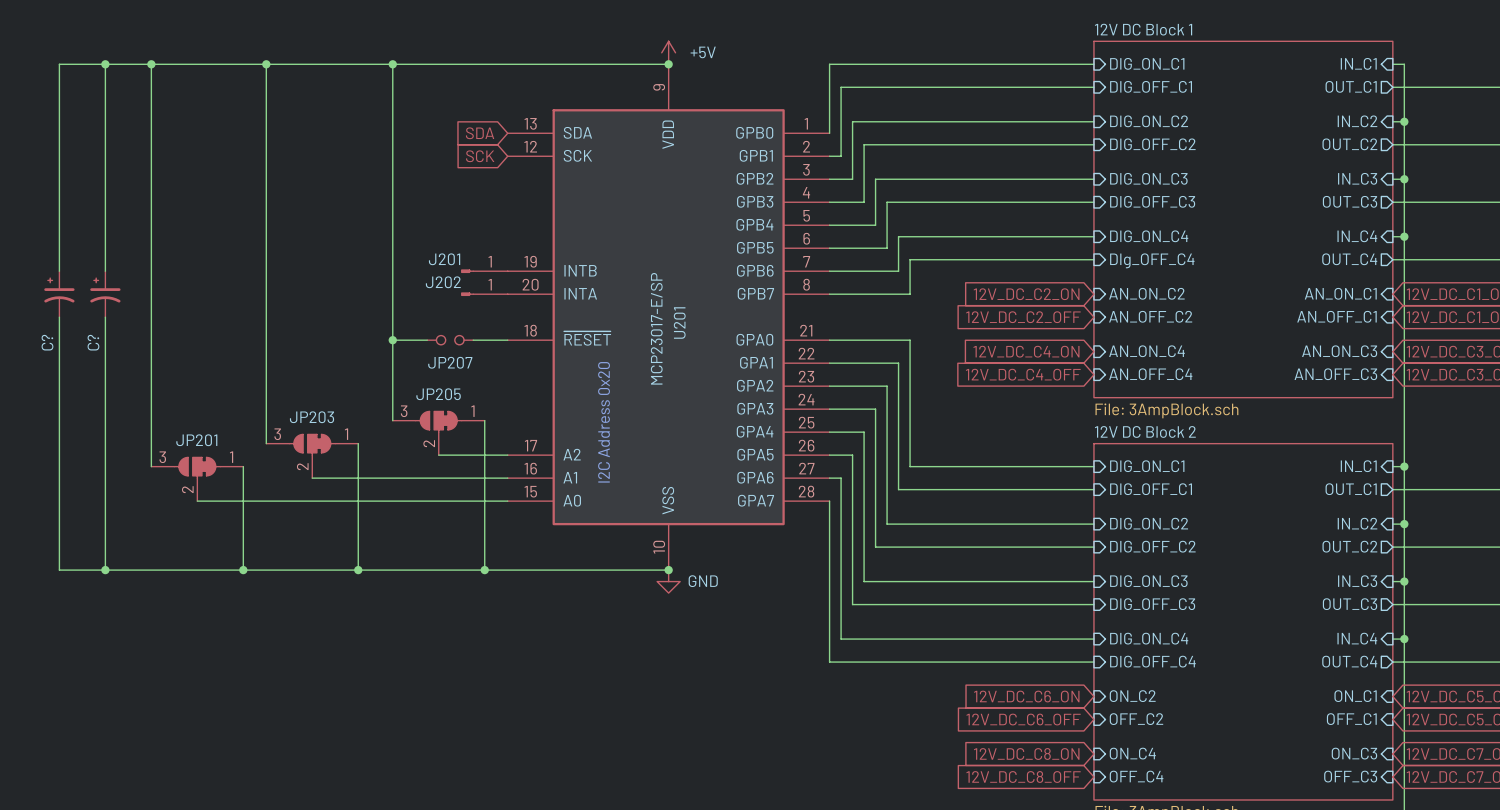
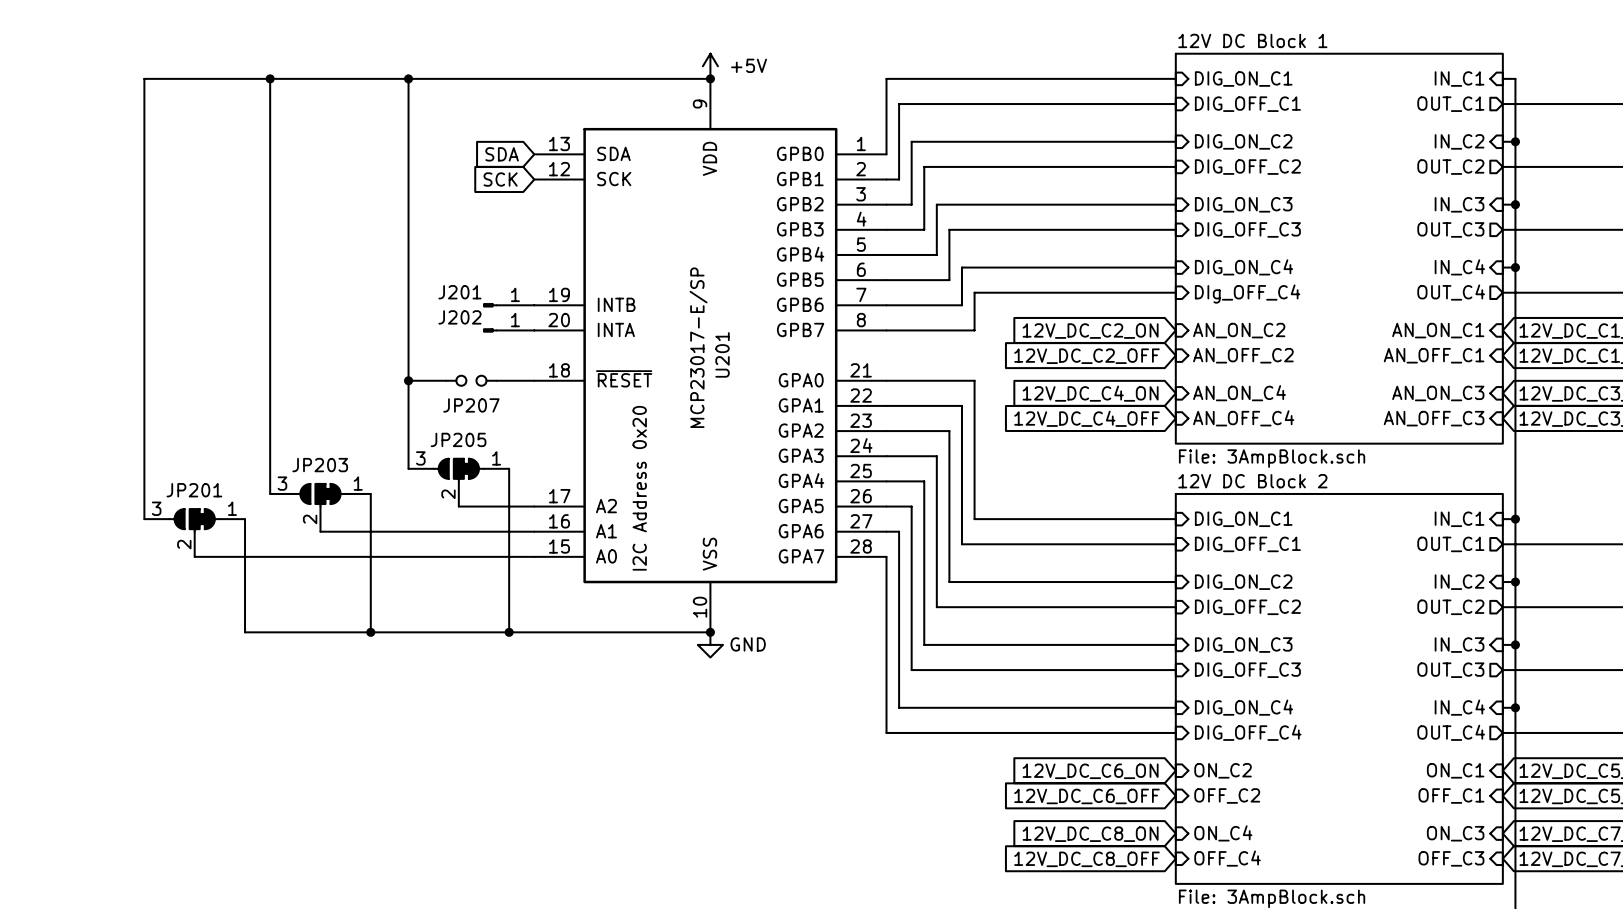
wire: (105, 64) (105, 271) -> none
junction: (105, 64) -> none
wire: (151, 64) (59, 64) (59, 271) -> none
junction: (151, 64) -> none
C?: (59, 294) -> none
C?: (105, 294) -> none
wire: (59, 317) (59, 570) (243, 570) -> none
wire: (105, 317) (105, 570) -> none
junction: (105, 570) -> none
junction: (243, 570) -> none

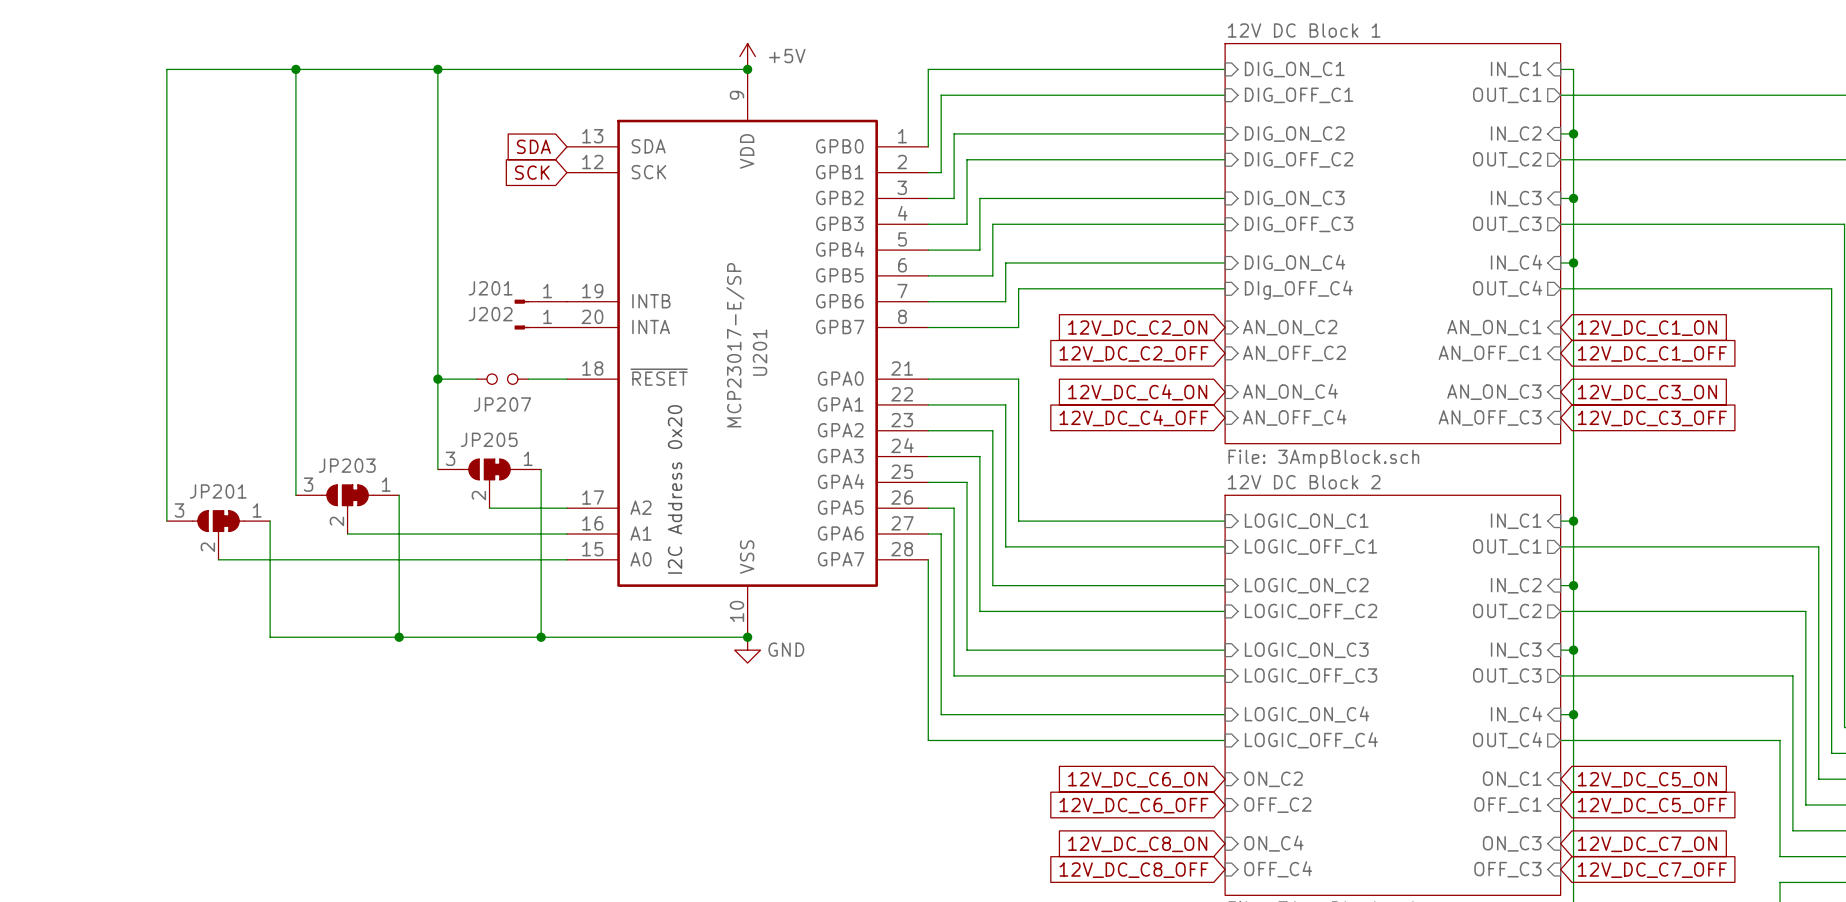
sheet pin: DIG_ON_C1 (1243, 519) -> LOGIC_ON_C1 (1306, 521)
sheet pin: DIG_OFF_C1 (1247, 544) -> LOGIC_OFF_C1 (1311, 547)
sheet pin: DIG_ON_C2 (1243, 582) -> LOGIC_ON_C2 (1306, 585)
sheet pin: DIG_OFF_C2 (1247, 607) -> LOGIC_OFF_C2 (1311, 611)
sheet pin: DIG_ON_C3 (1243, 645) -> LOGIC_ON_C3 (1306, 650)
sheet pin: DIG_OFF_C3 (1247, 670) -> LOGIC_OFF_C3 (1311, 676)
sheet pin: DIG_ON_C4 (1244, 707) -> LOGIC_ON_C4 (1307, 714)
sheet pin: DIG_OFF_C4 (1248, 732) -> LOGIC_OFF_C4 (1311, 740)

